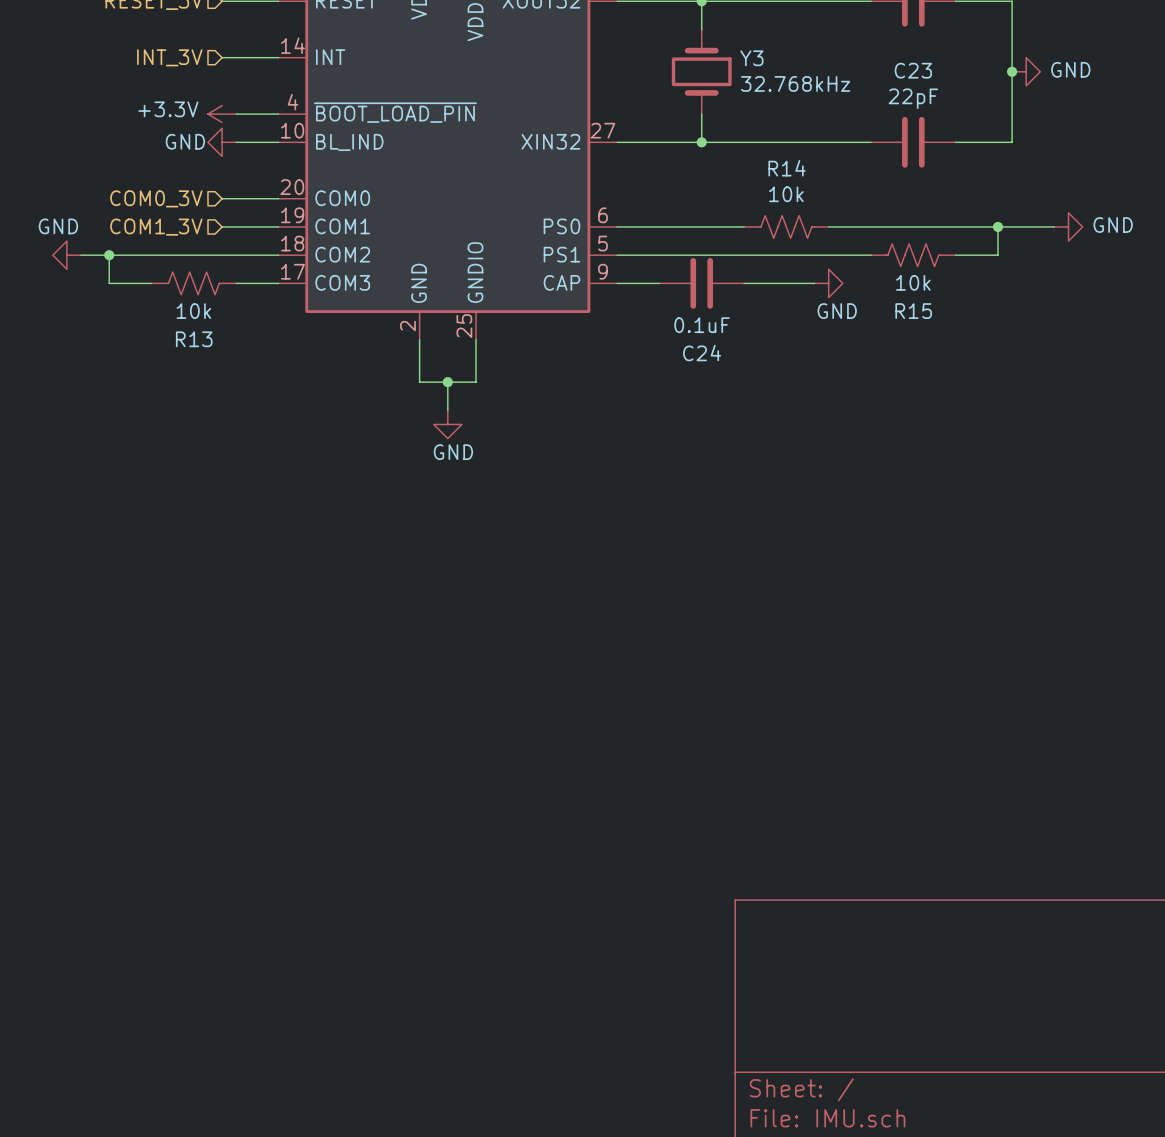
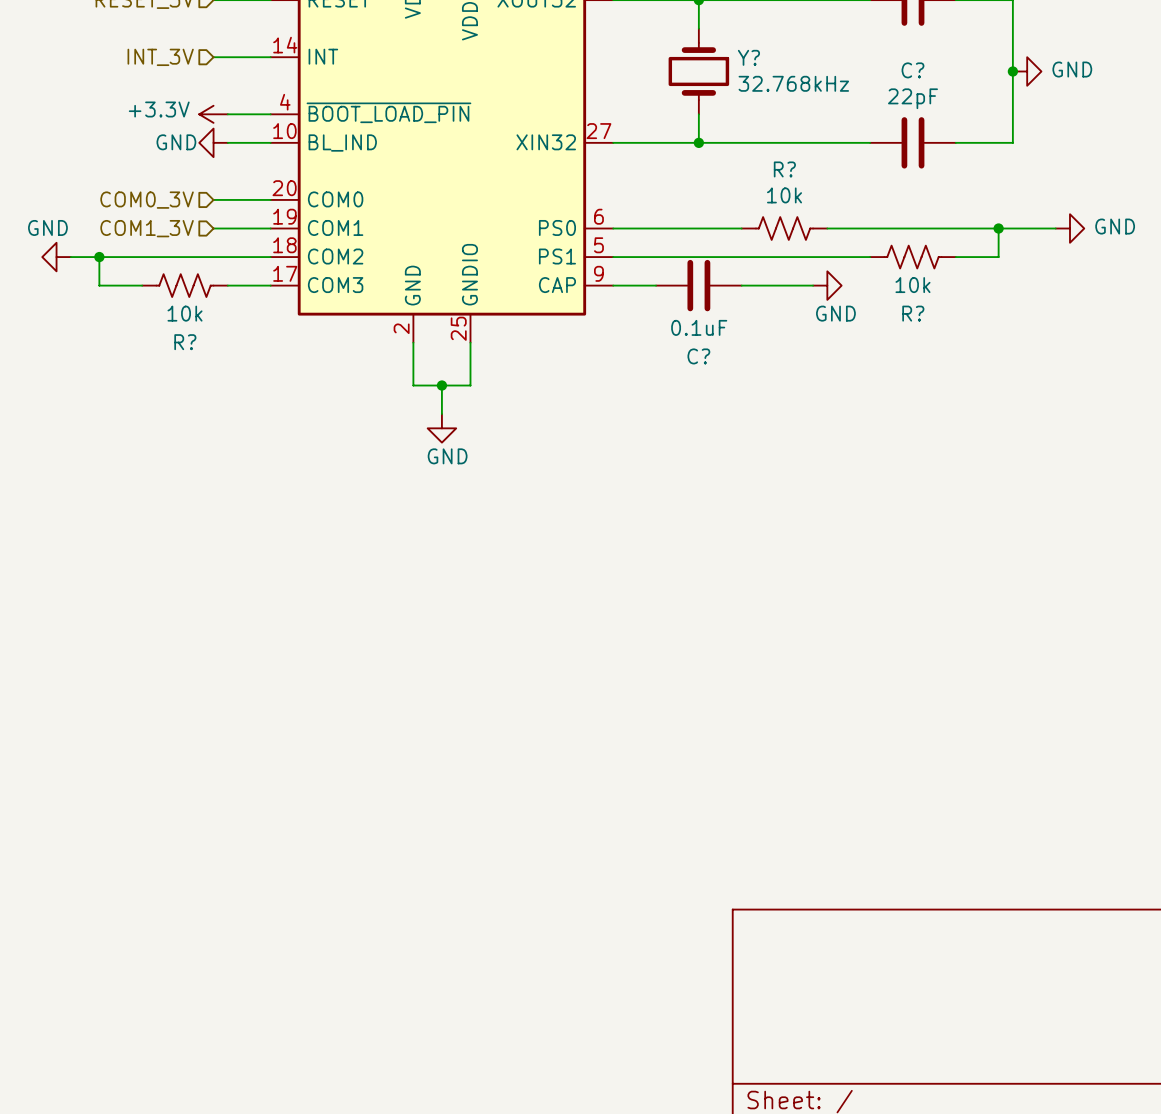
Y3 name: Y3 (751, 58) -> Y? (748, 57)
C23 name: C23 (913, 70) -> C? (912, 70)
R14 name: R14 (787, 168) -> R? (784, 169)
R15 name: R15 (913, 311) -> R? (913, 313)
R13 name: R13 (194, 339) -> R? (185, 342)
C24 name: C24 (702, 353) -> C? (698, 356)

